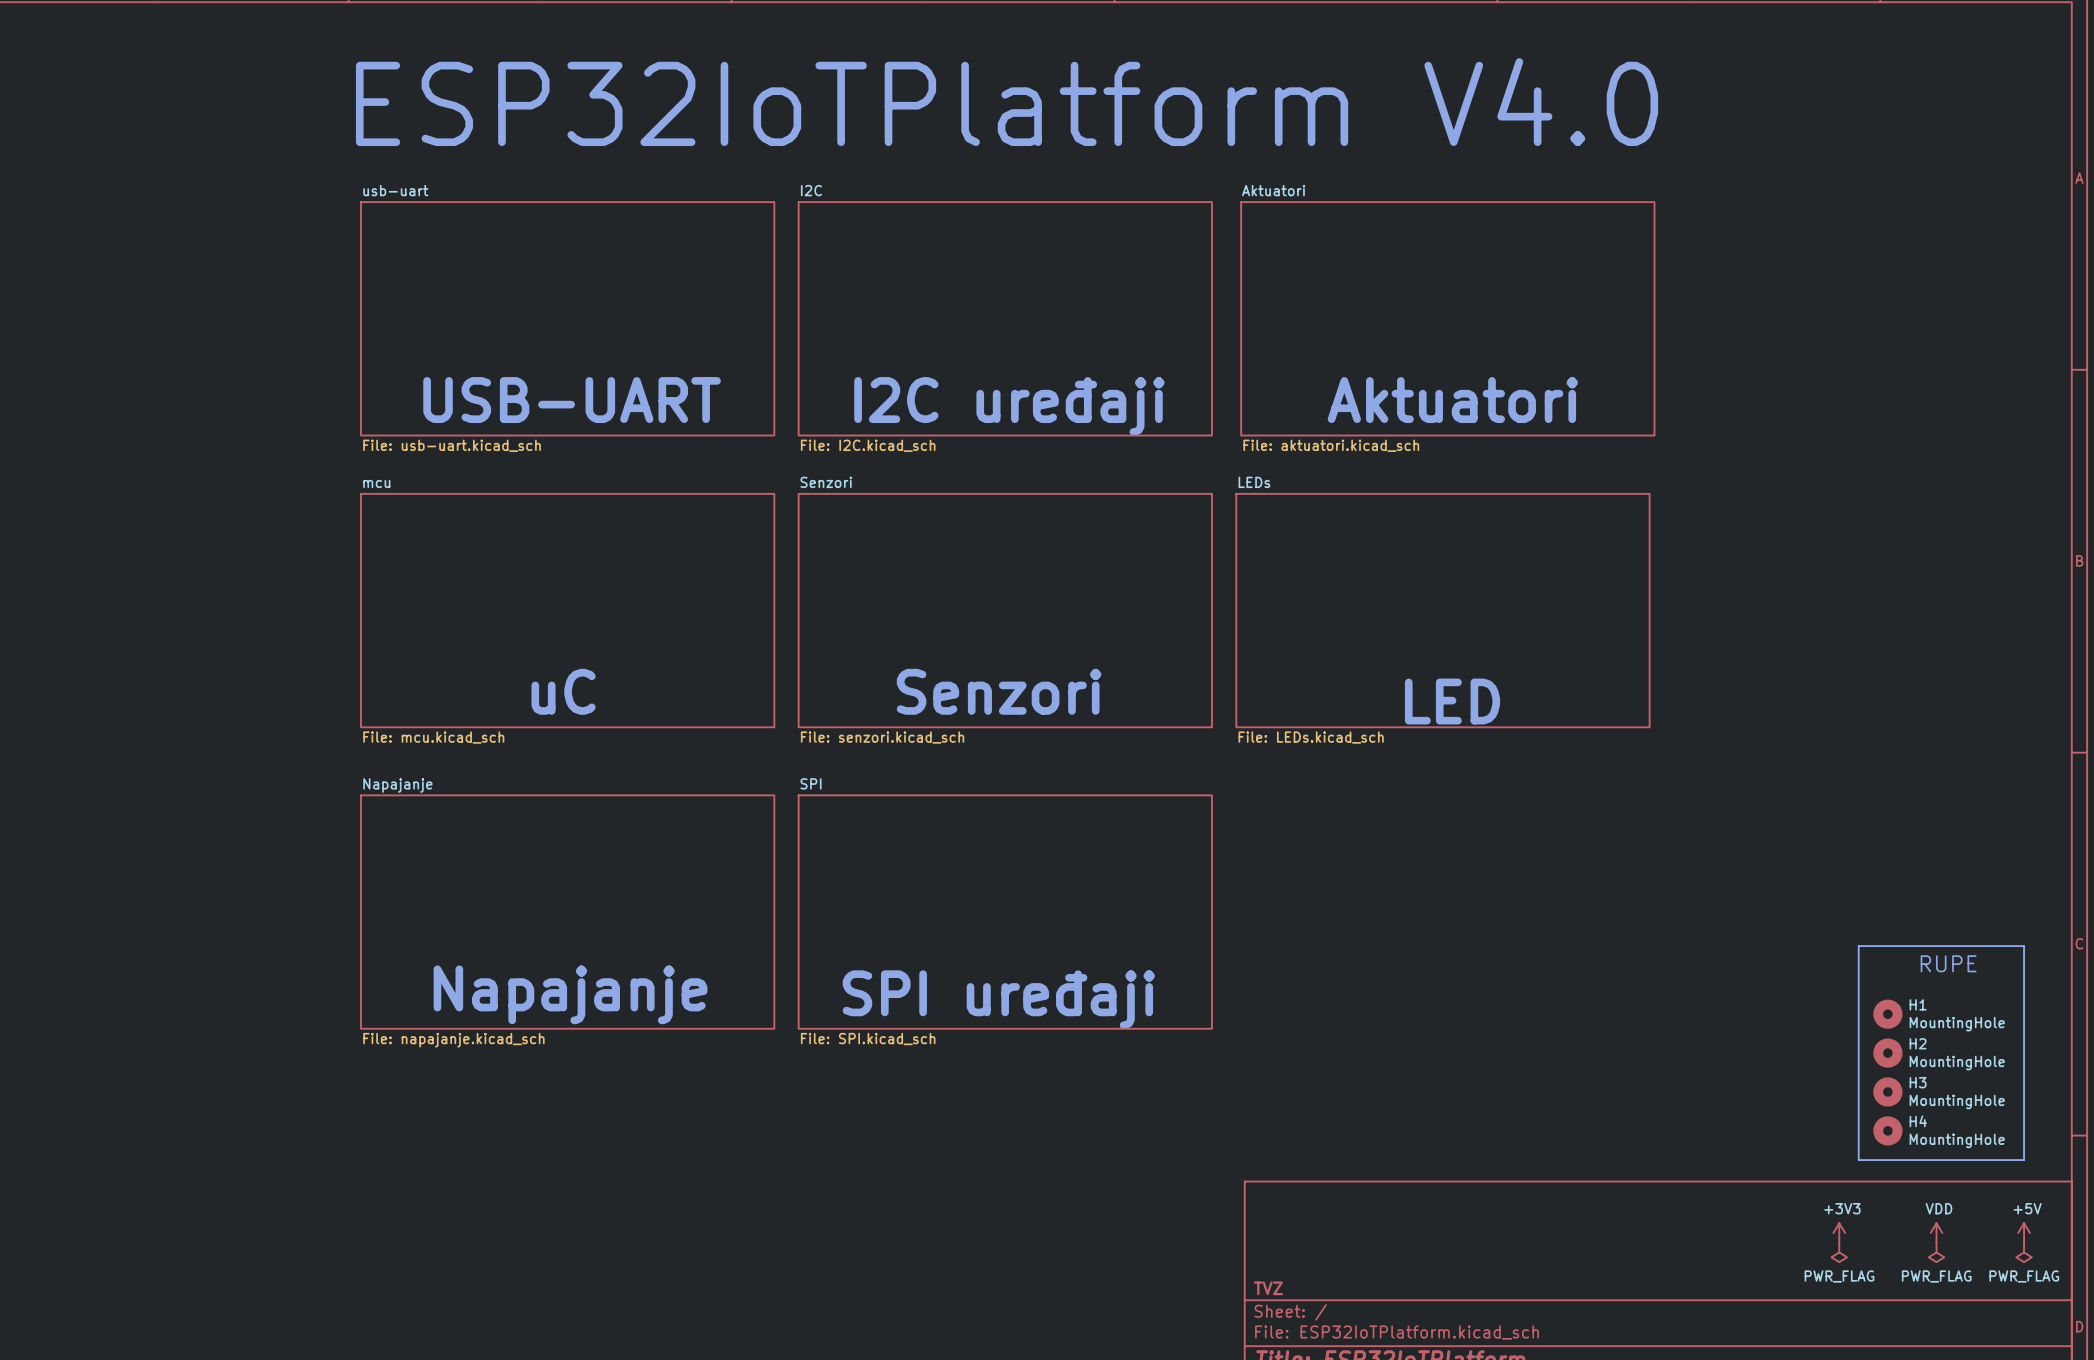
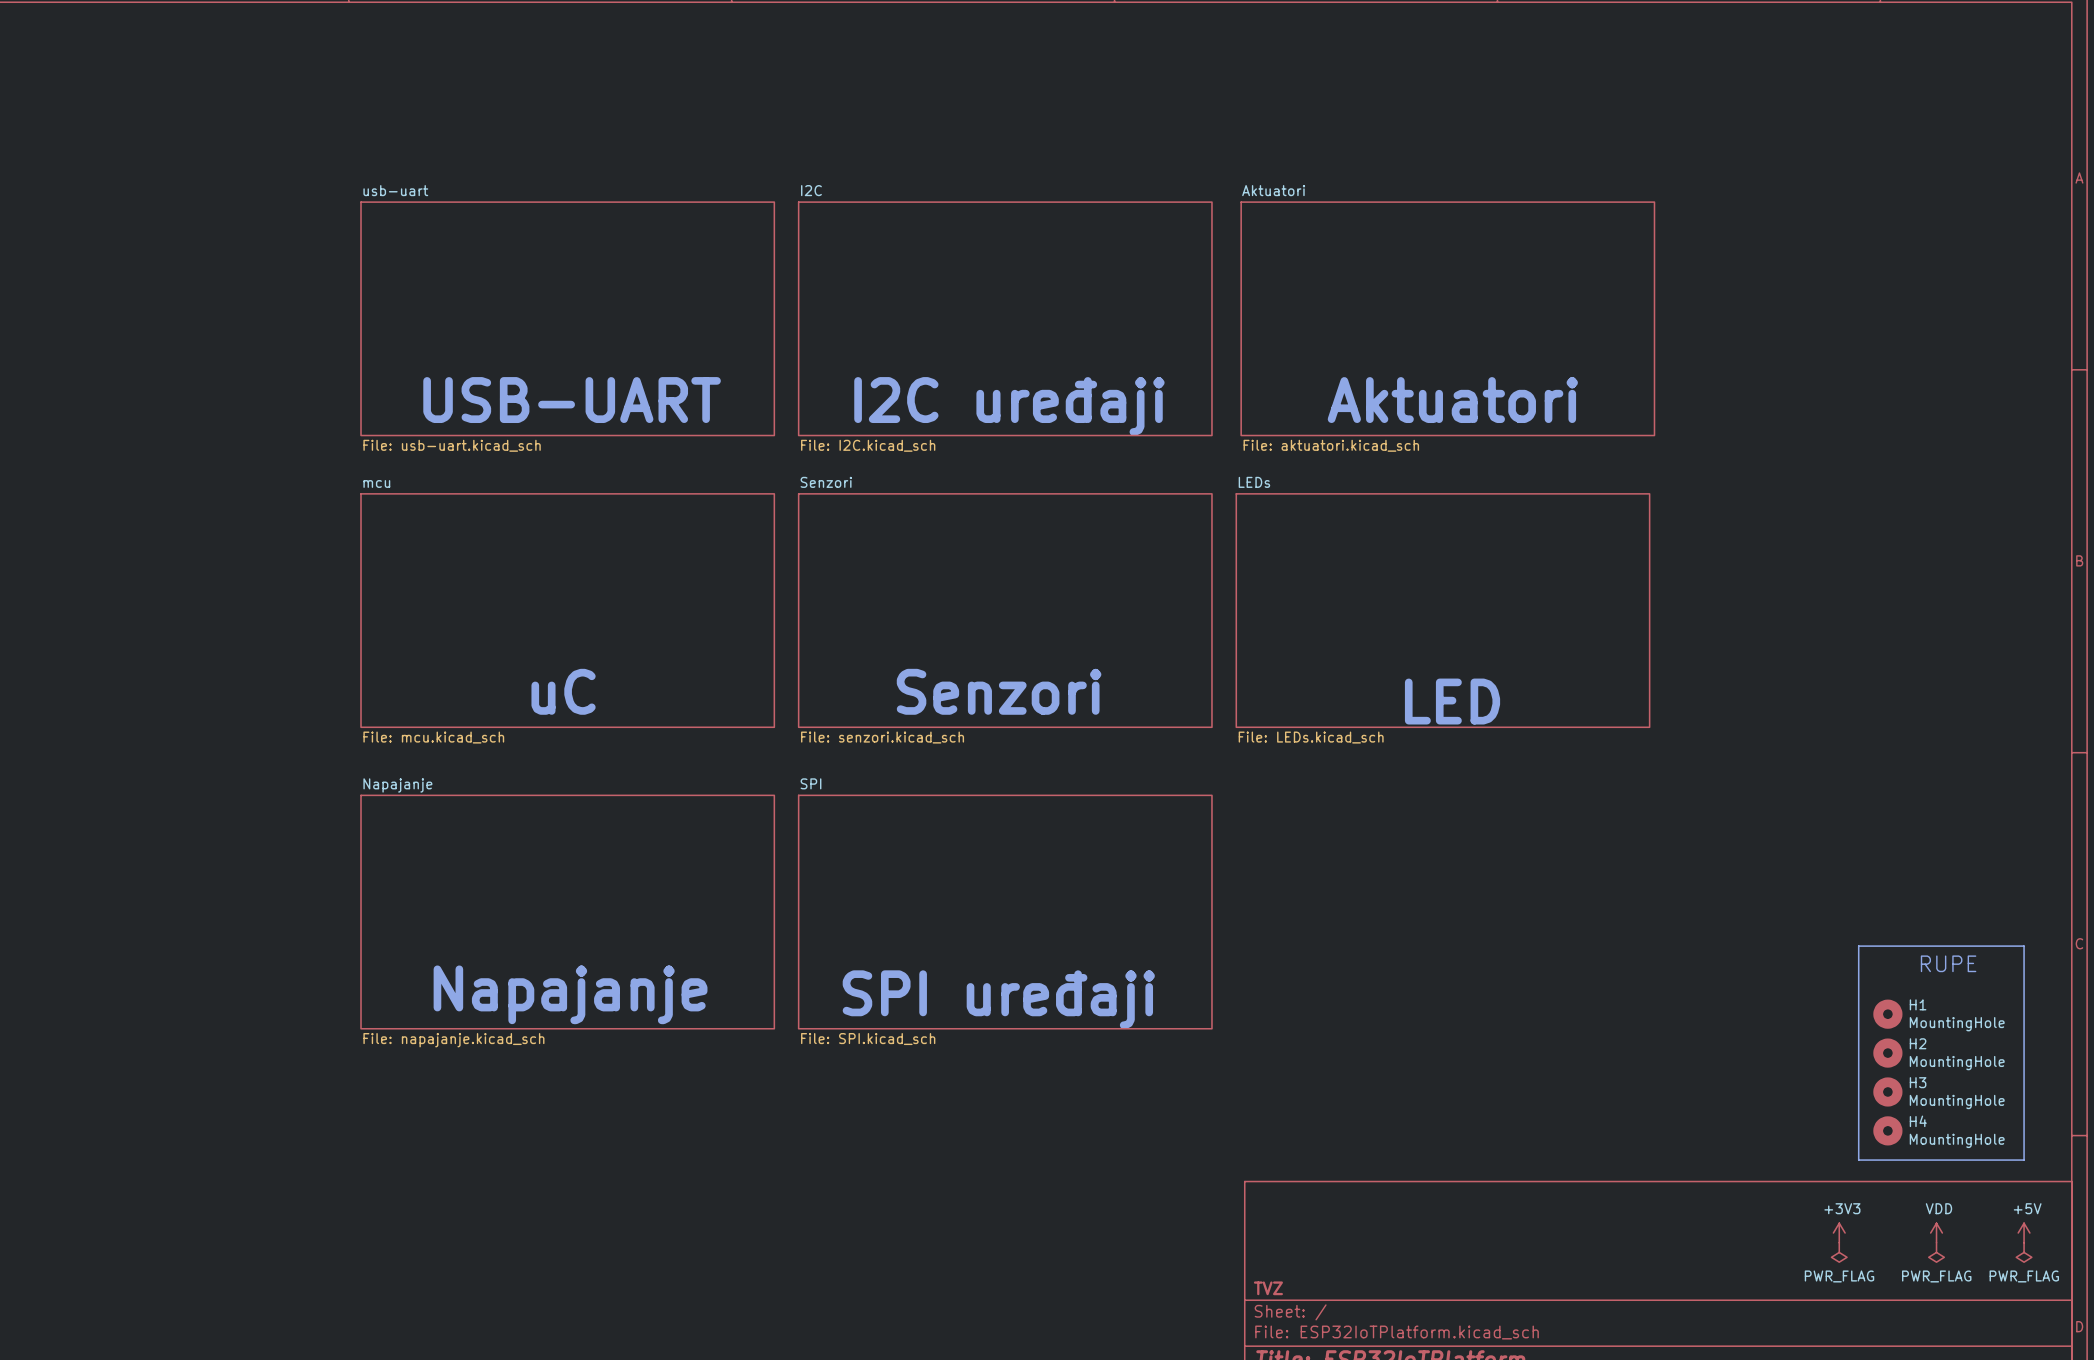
text: ESP32IoTPlatform V4.0 (1007, 102) -> none

